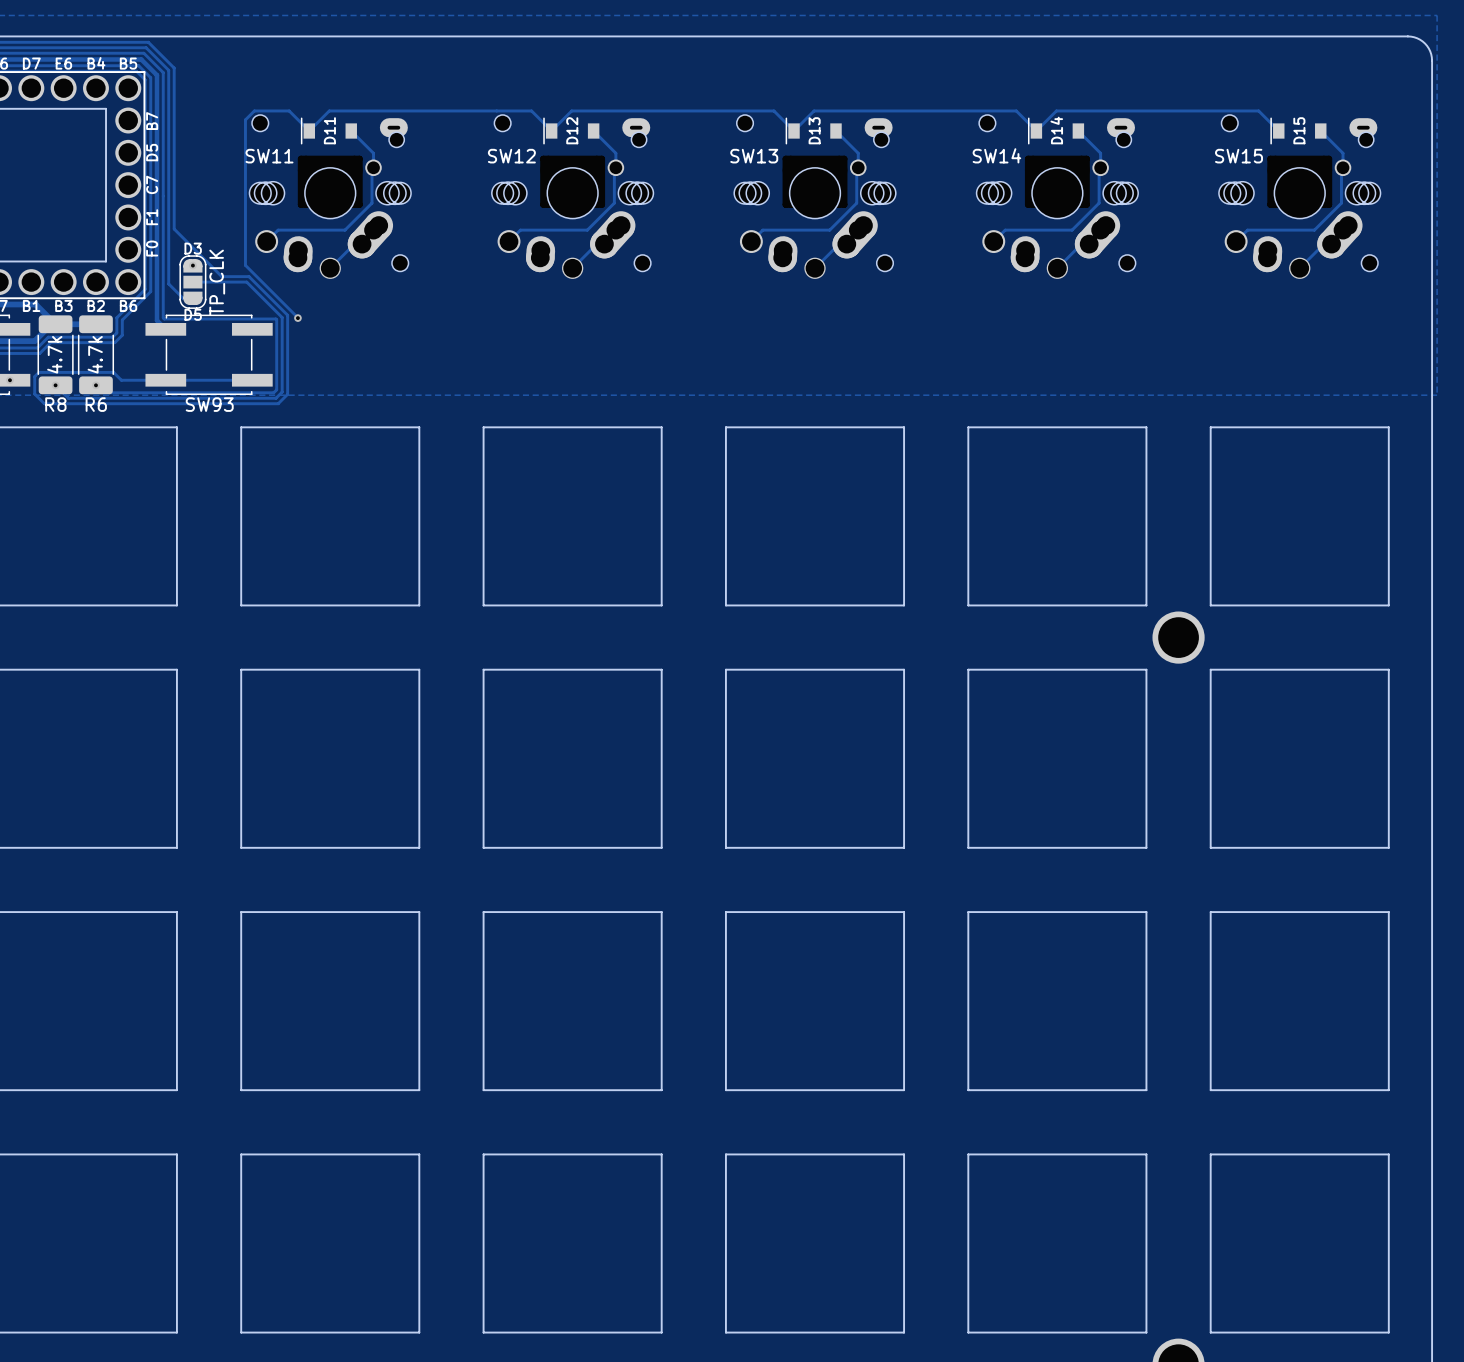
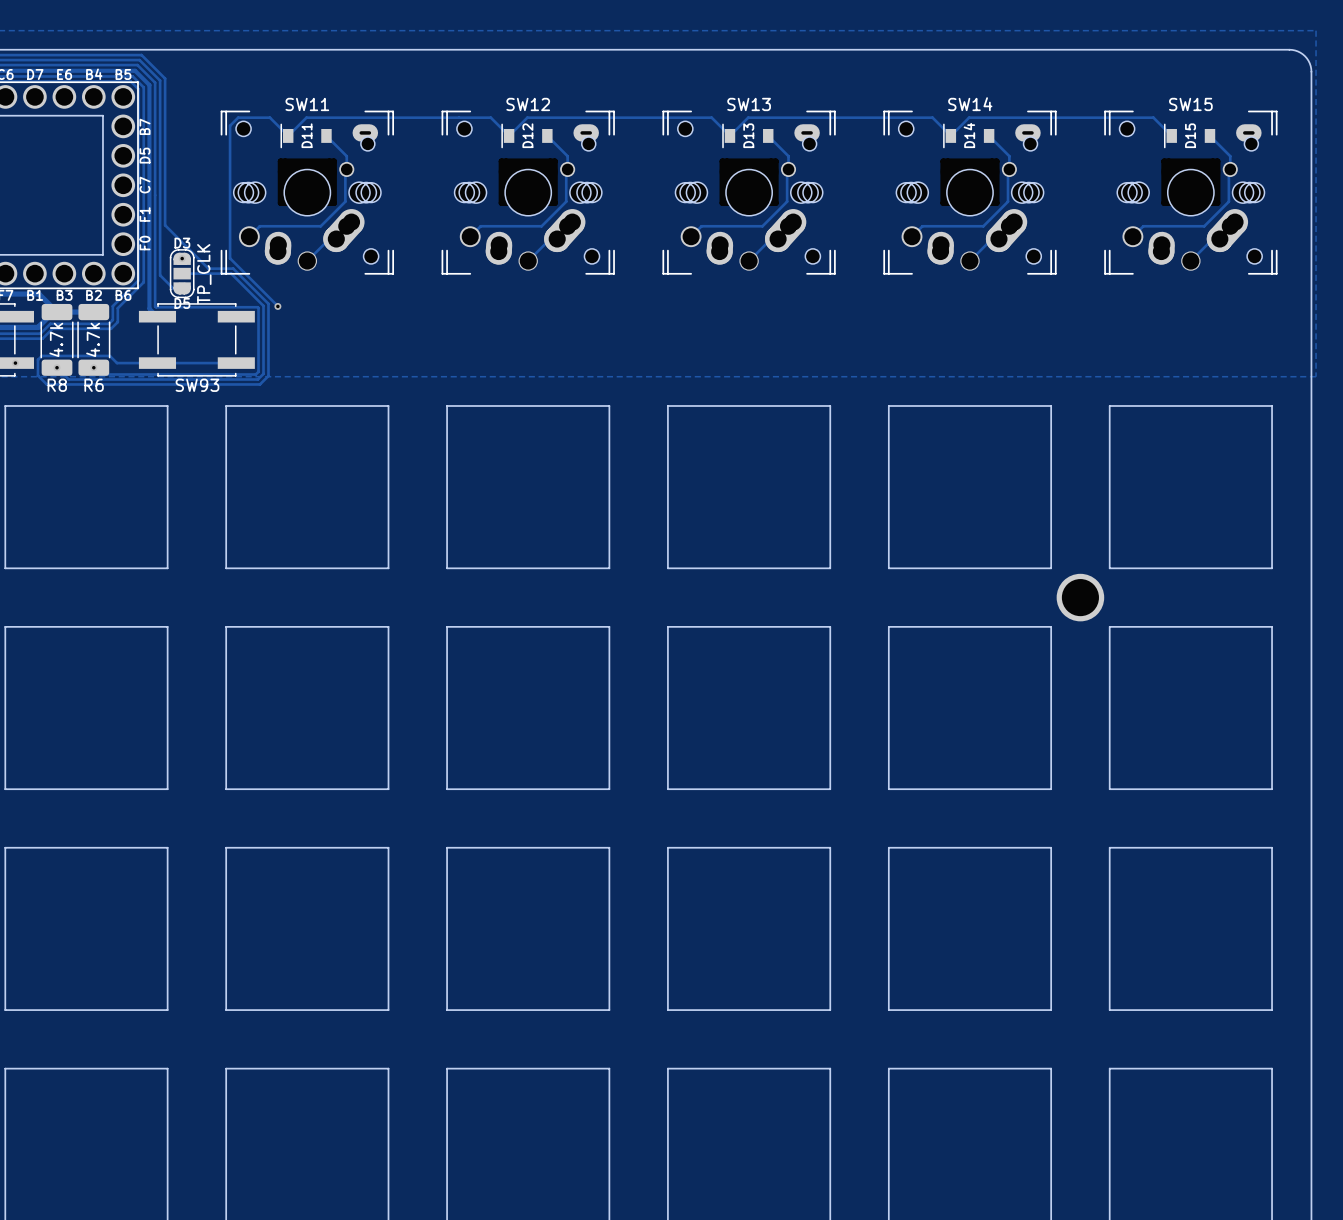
SW11 footprint: [249, 114, 412, 279] -> [220, 110, 395, 275]
SW12 footprint: [491, 114, 654, 279] -> [441, 110, 615, 275]
SW13 footprint: [734, 114, 896, 279] -> [662, 110, 836, 275]
SW14 footprint: [976, 114, 1139, 279] -> [883, 110, 1057, 275]
SW15 footprint: [1218, 114, 1381, 279] -> [1104, 110, 1278, 275]
SW14 name position: SW14 (996, 155) -> SW14 (970, 104)
SW11 name position: SW11 (269, 156) -> SW11 (307, 104)
SW12 name position: SW12 (511, 156) -> SW12 (528, 104)
SW13 name position: SW13 (754, 156) -> SW13 (749, 104)
SW15 name position: SW15 (1238, 156) -> SW15 (1190, 104)

